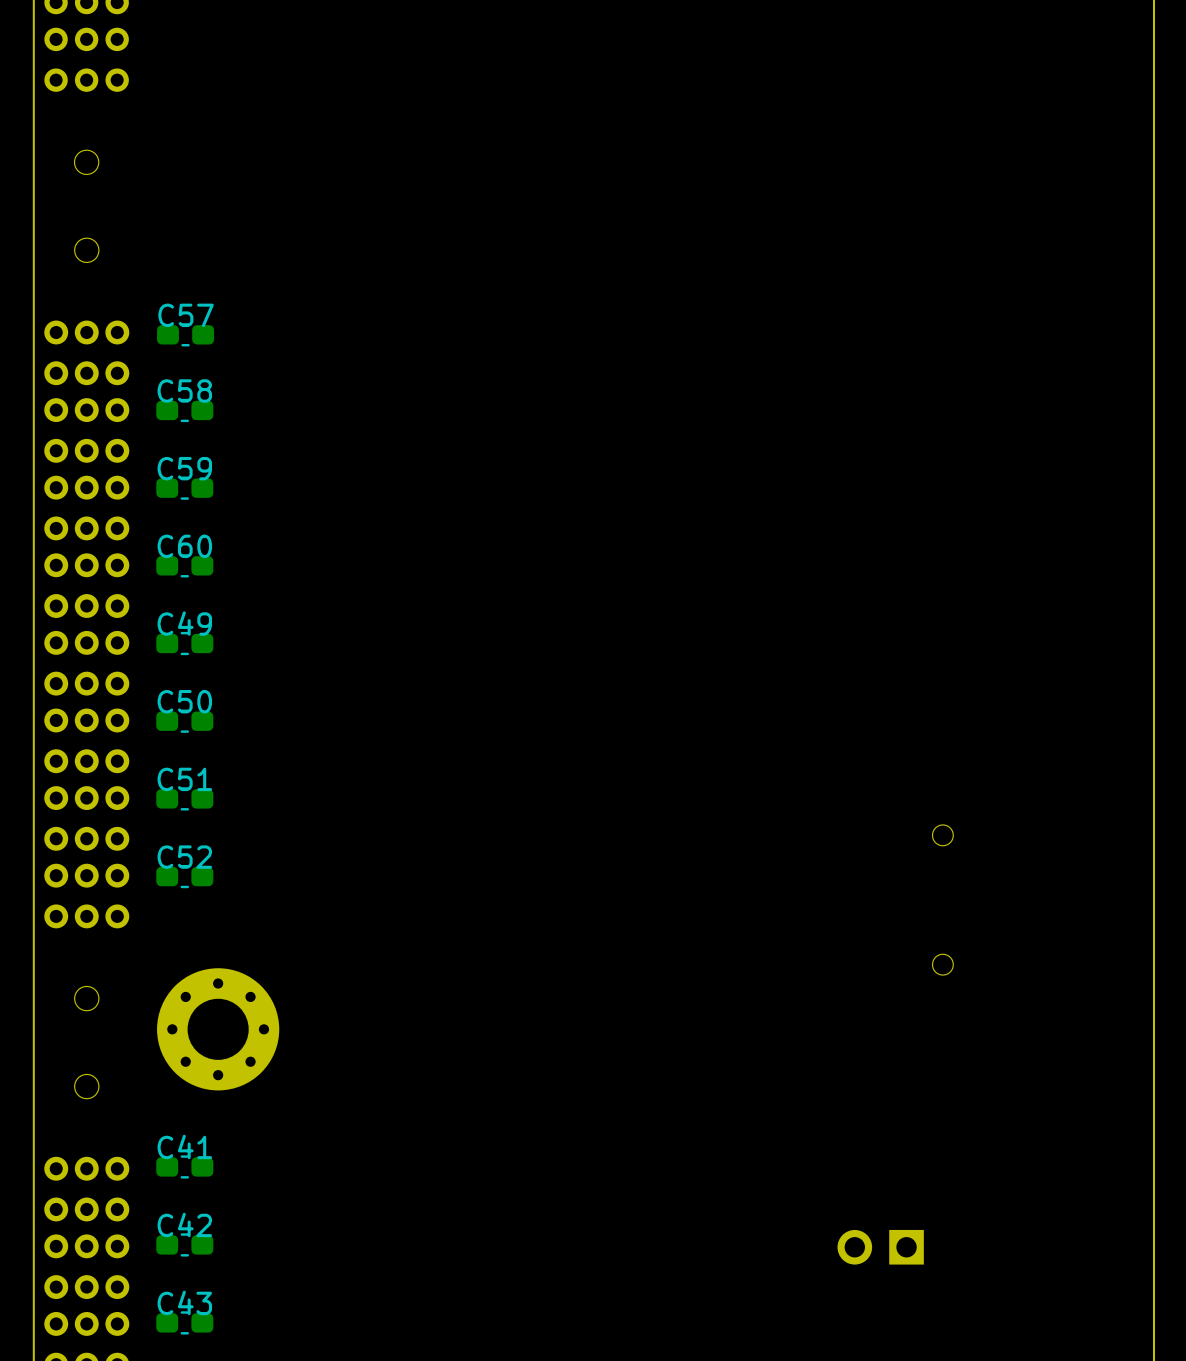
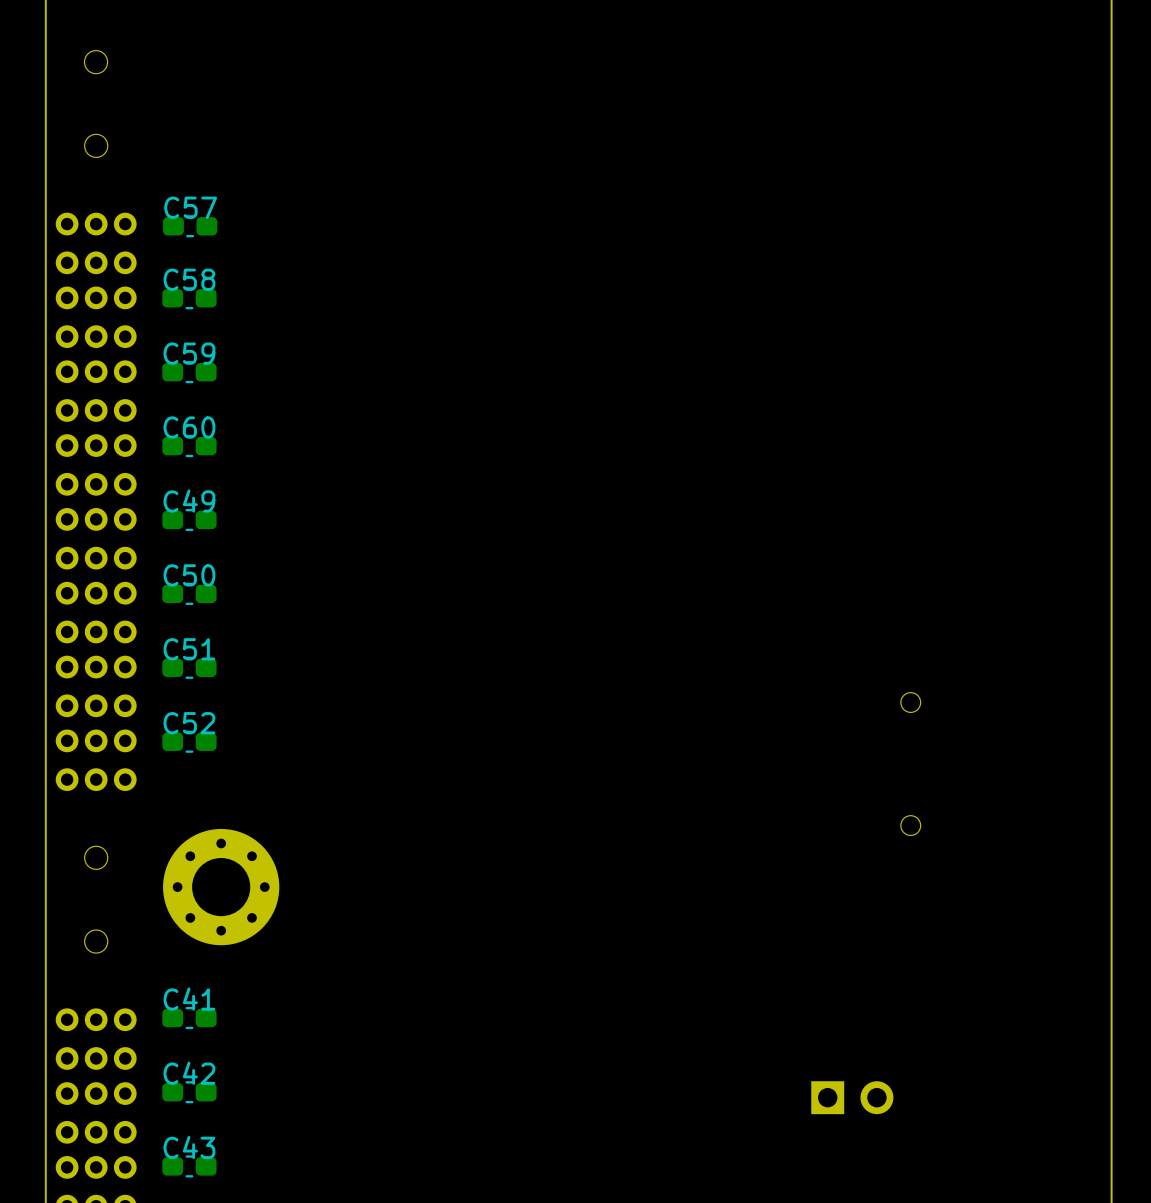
part rotation: 0° (880, 1247) -> 180° (852, 1097)

